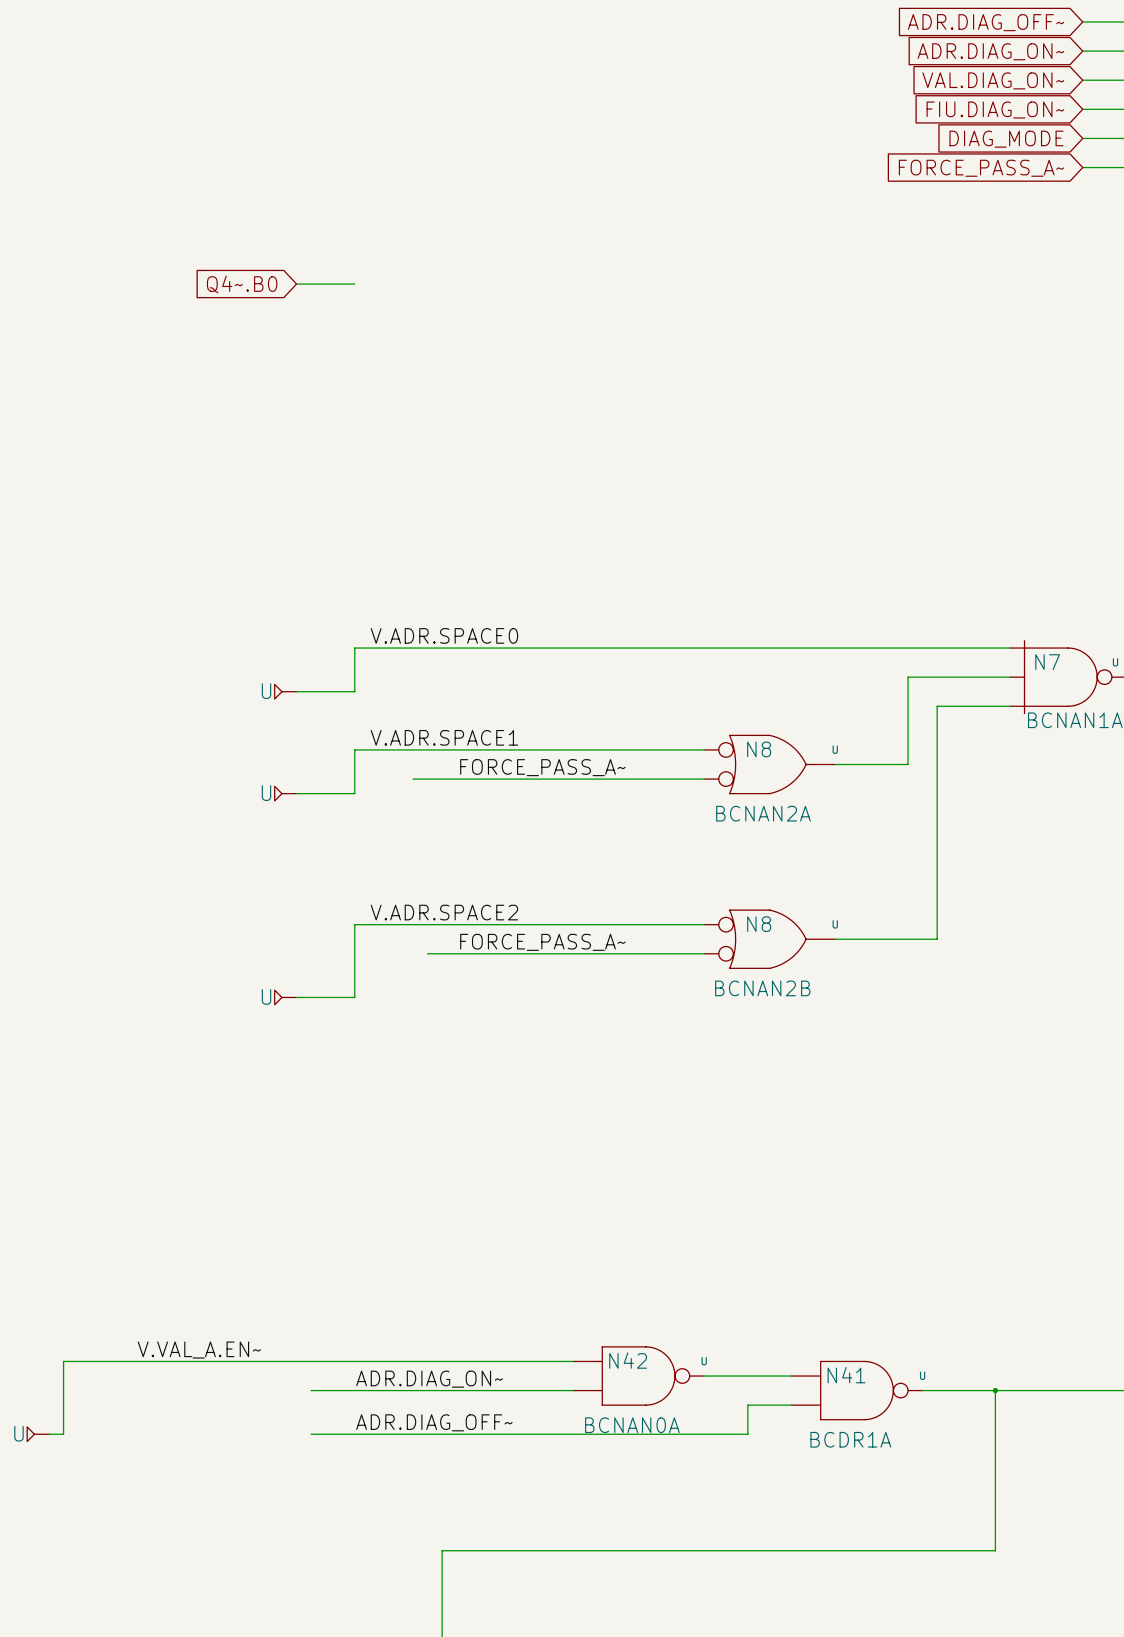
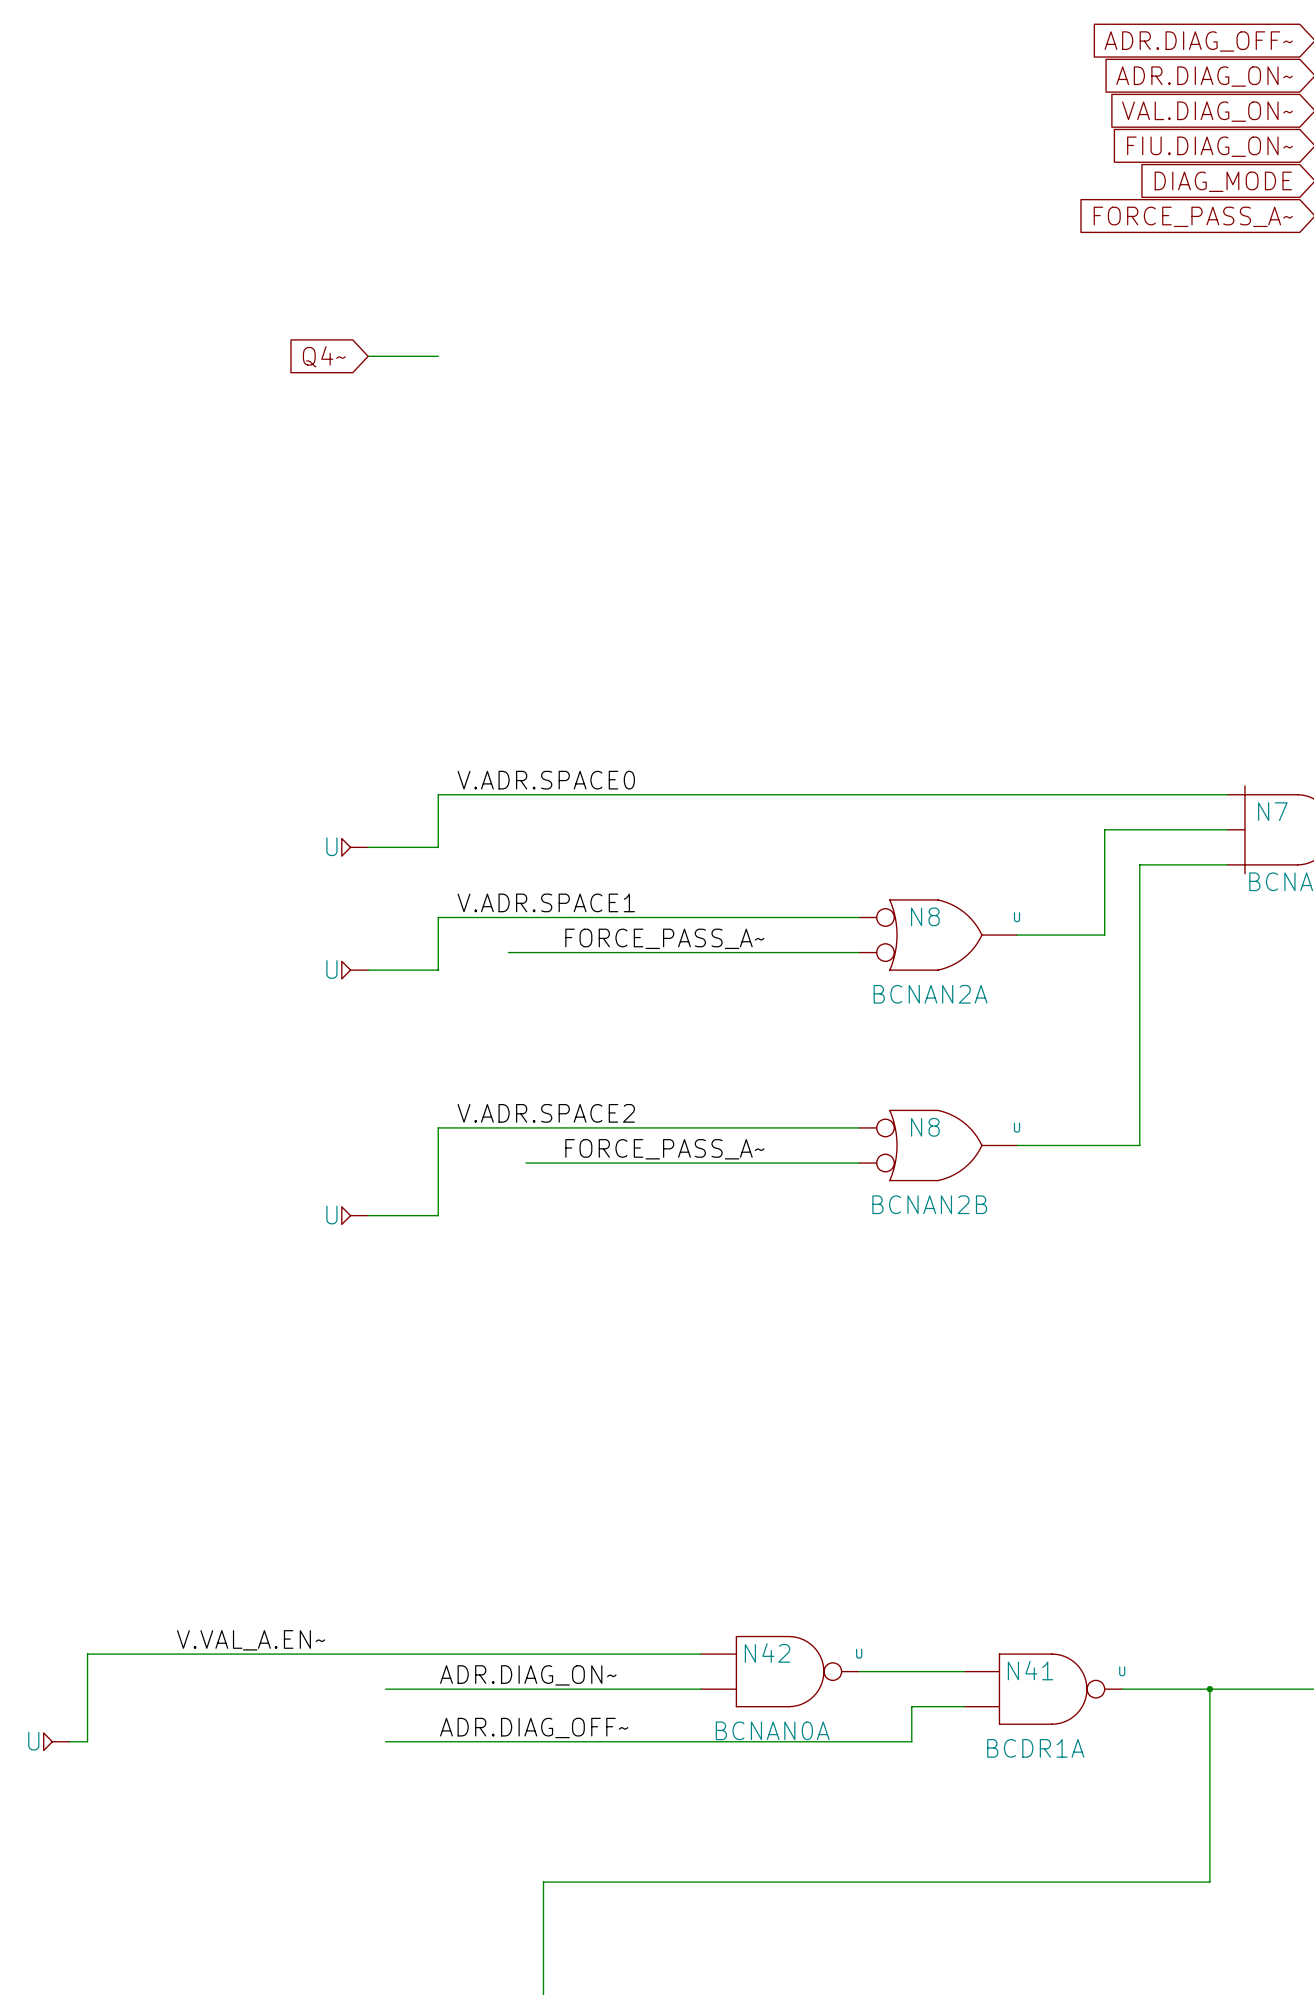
global label: Q4~.B0 (242, 284) -> Q4~ (324, 356)

